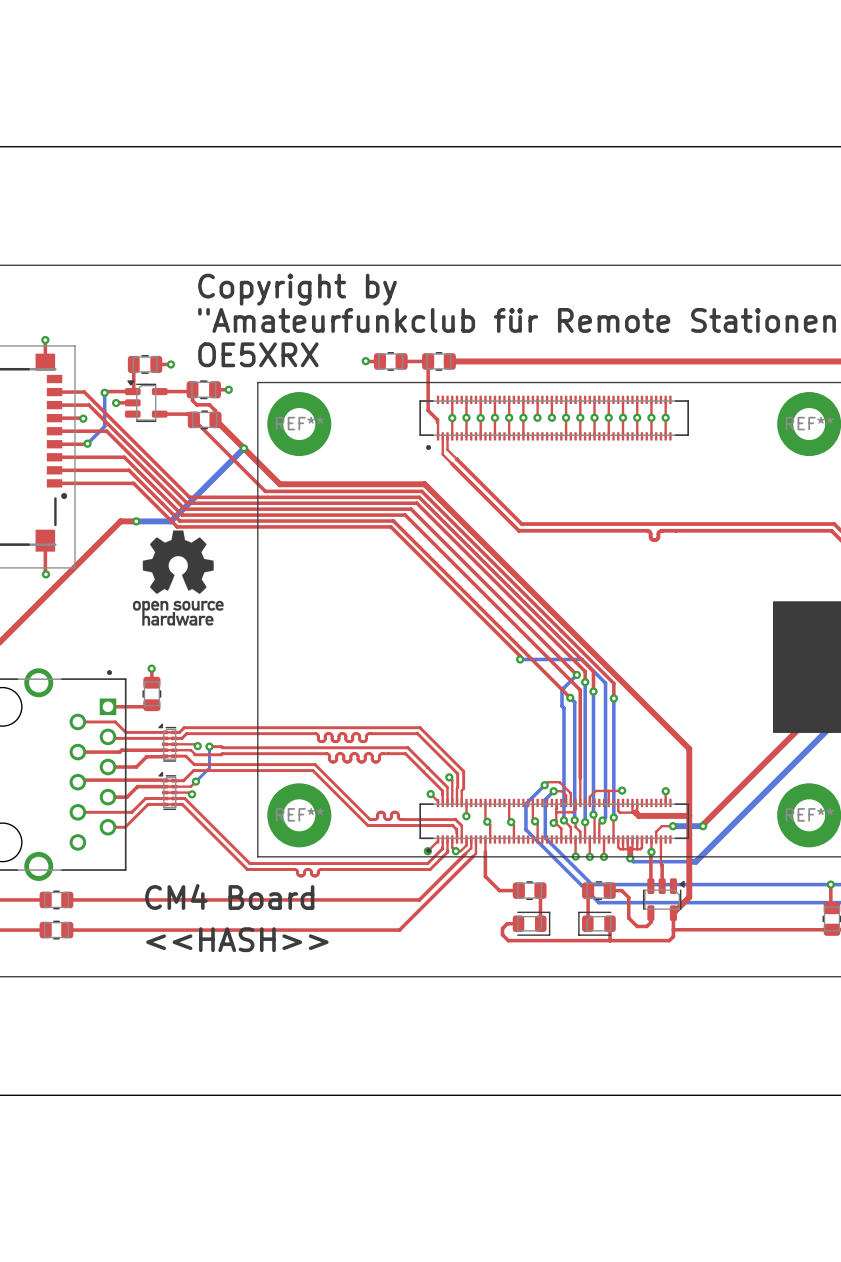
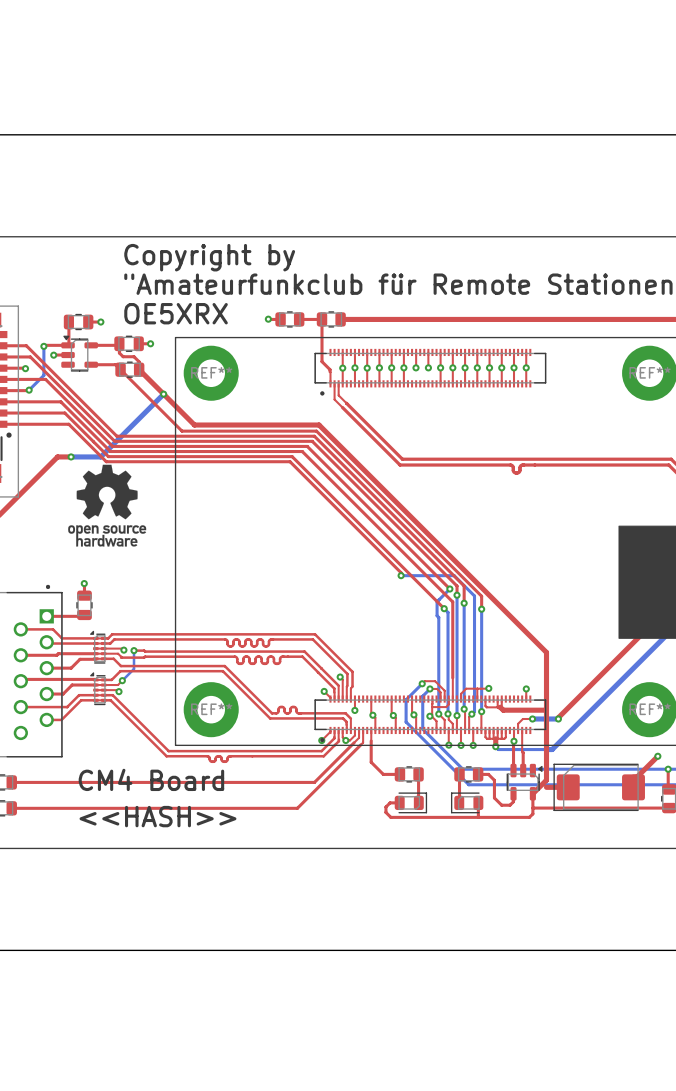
top track: none -> (657, 756) (633, 780) (633, 787)
via: none -> (657, 756)
top track: none -> (546, 787) (568, 787)
part: none -> (599, 787)

